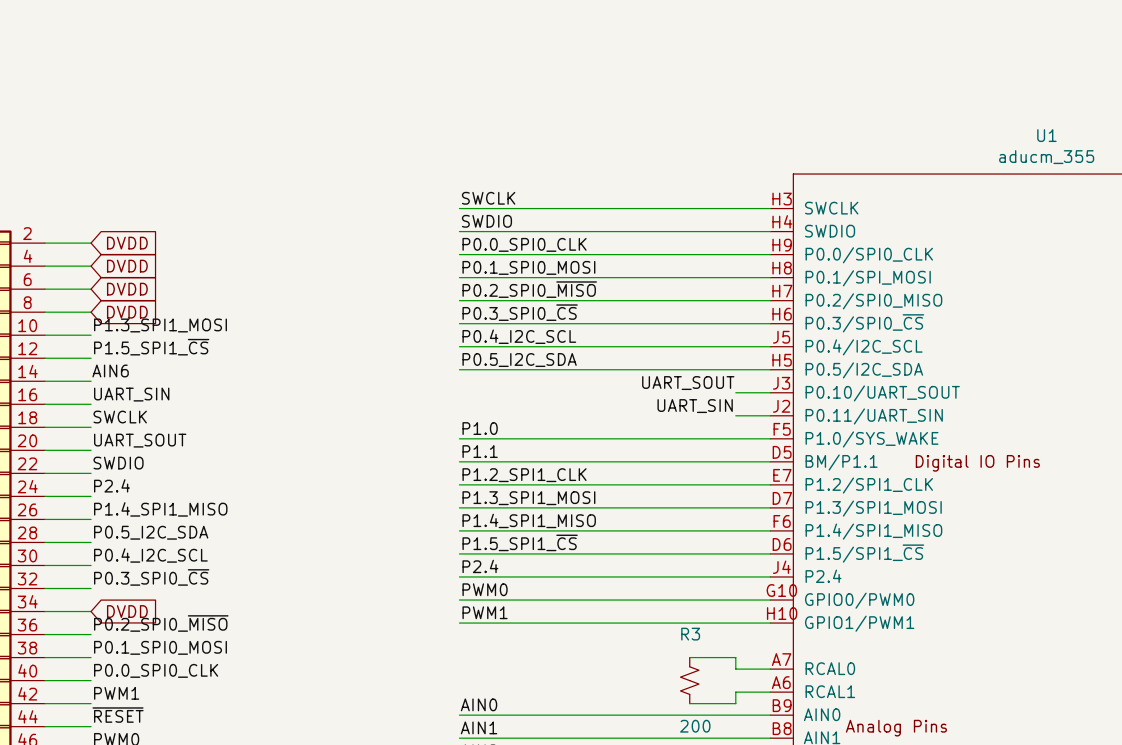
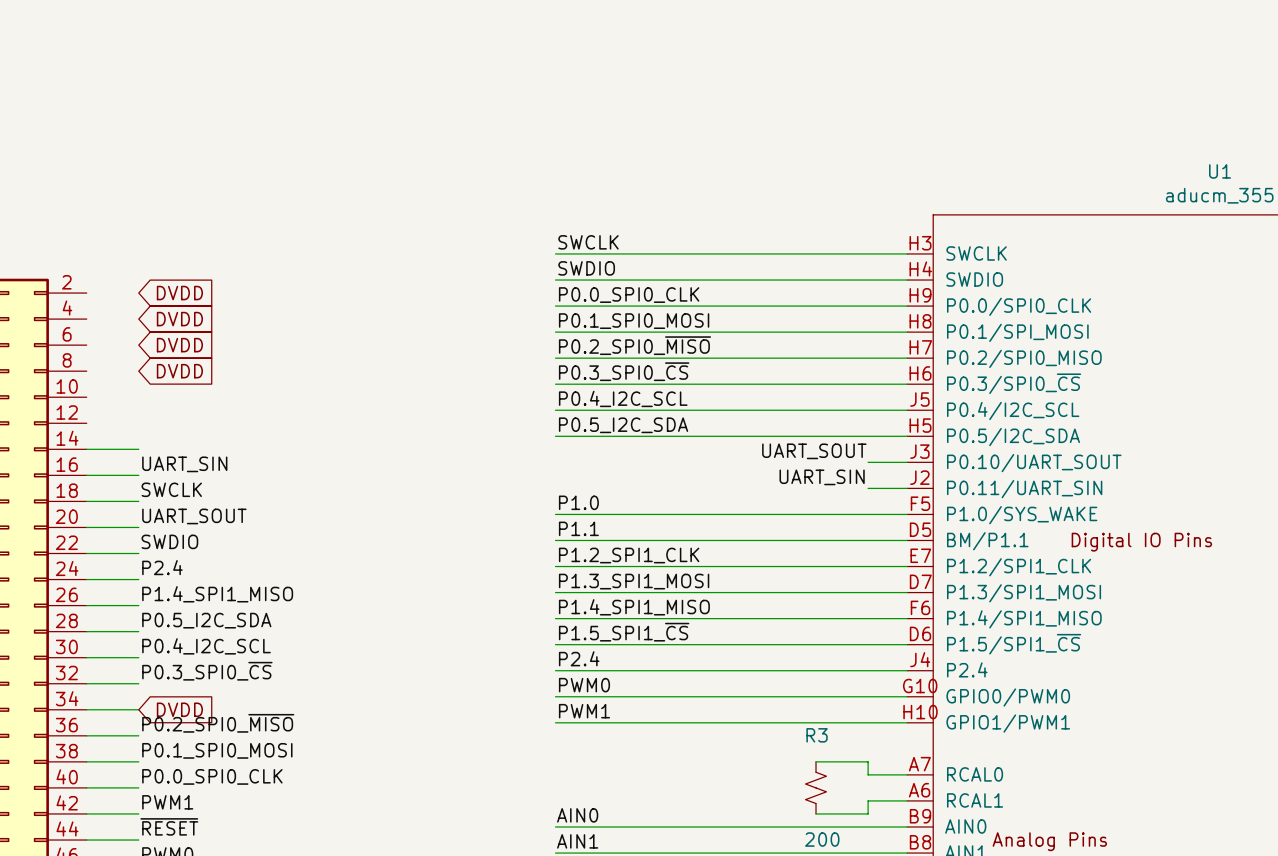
wire: (44, 243) (91, 243) -> none
wire: (44, 266) (91, 266) -> none
wire: (44, 289) (91, 289) -> none
wire: (44, 312) (91, 312) -> none
label: P1.3_SPI1_MOSI (160, 325) -> none
wire: (44, 335) (91, 335) -> none
label: P1.5_SPI1_~{CS} (151, 347) -> none
wire: (44, 358) (91, 358) -> none
label: AIN6 (110, 370) -> none

